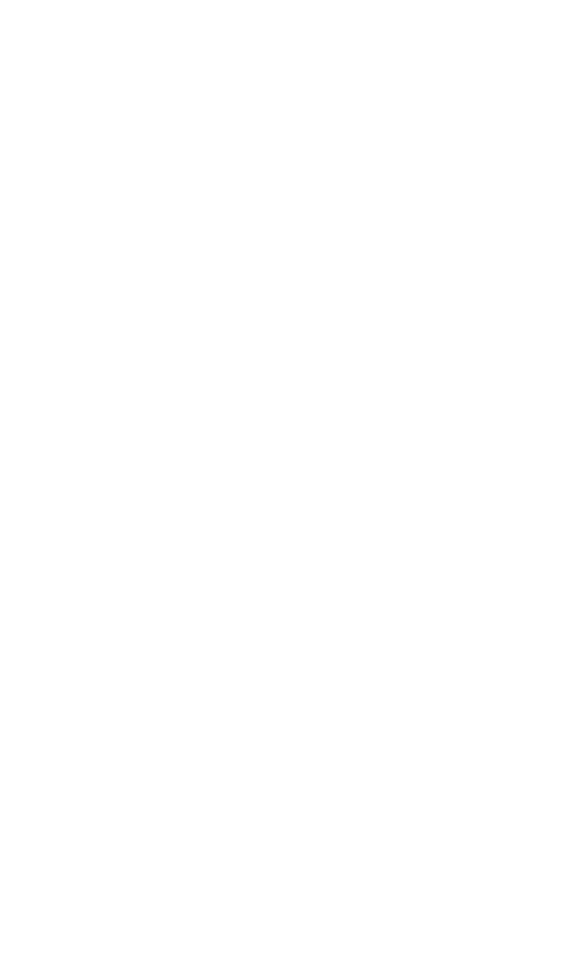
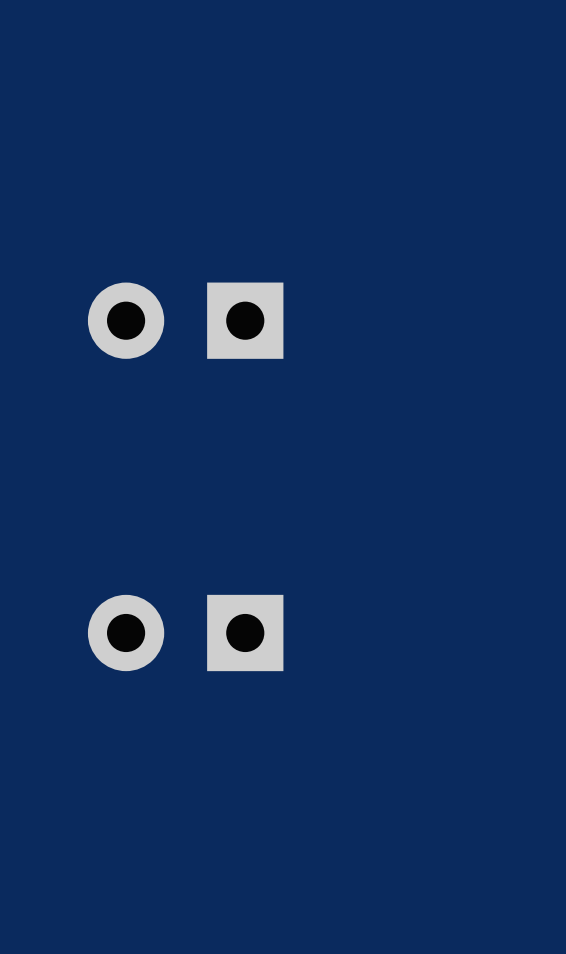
part: none -> (185, 320)
part: none -> (185, 633)

